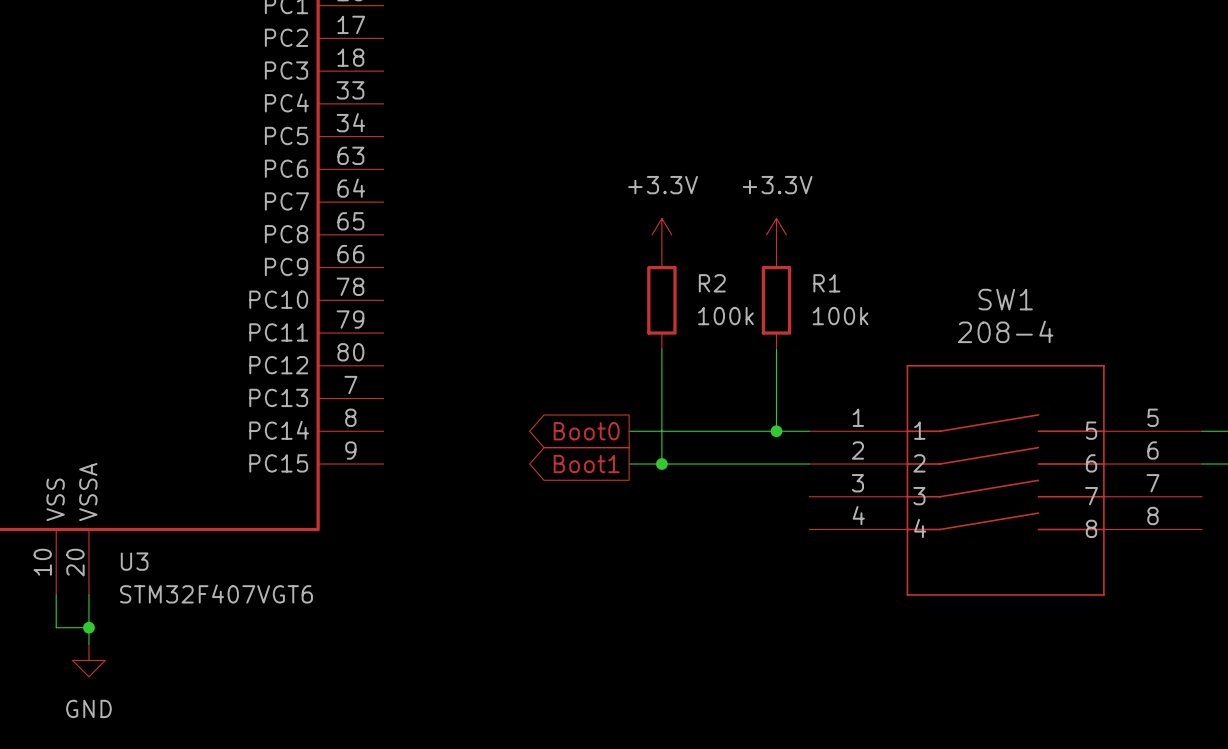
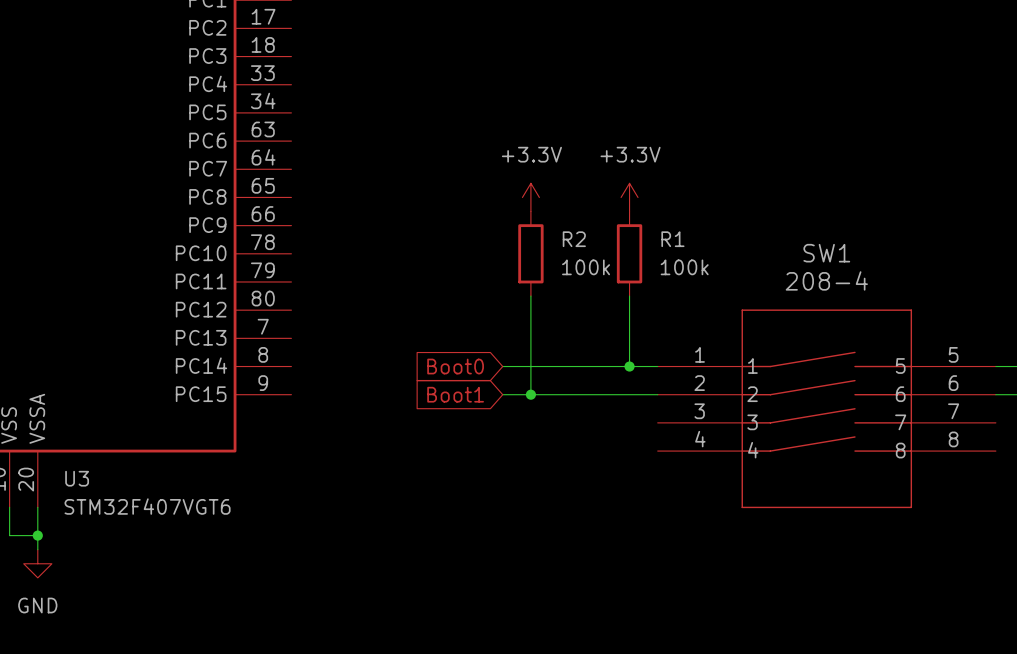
global label shape: output (586, 431) -> input (455, 366)
global label shape: output (586, 464) -> input (455, 394)

